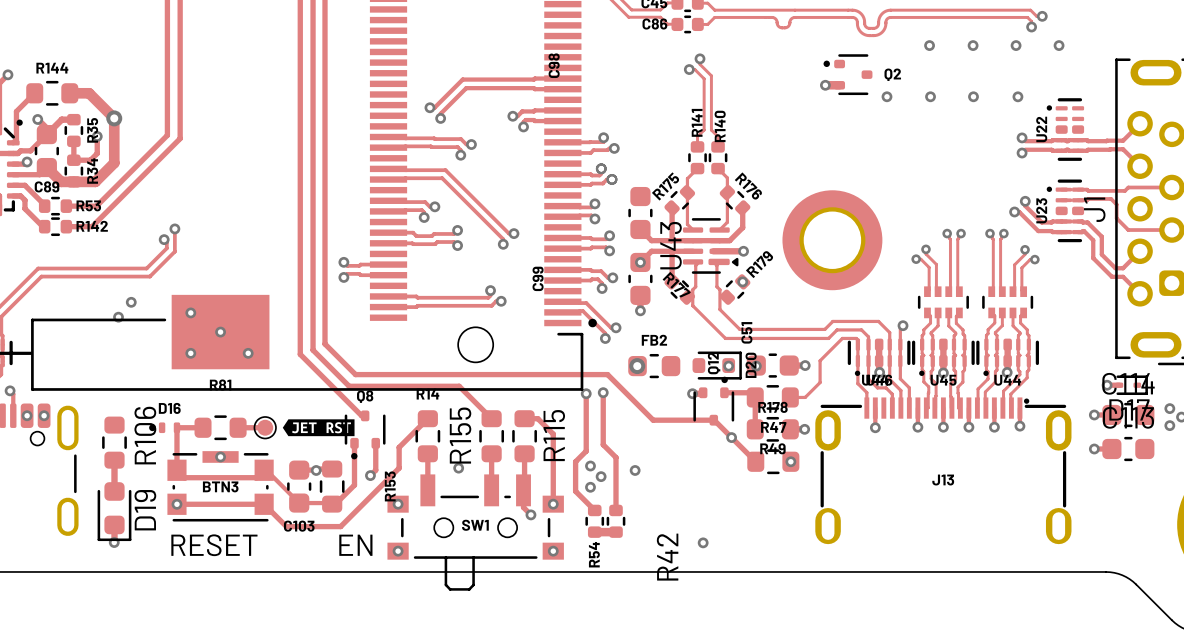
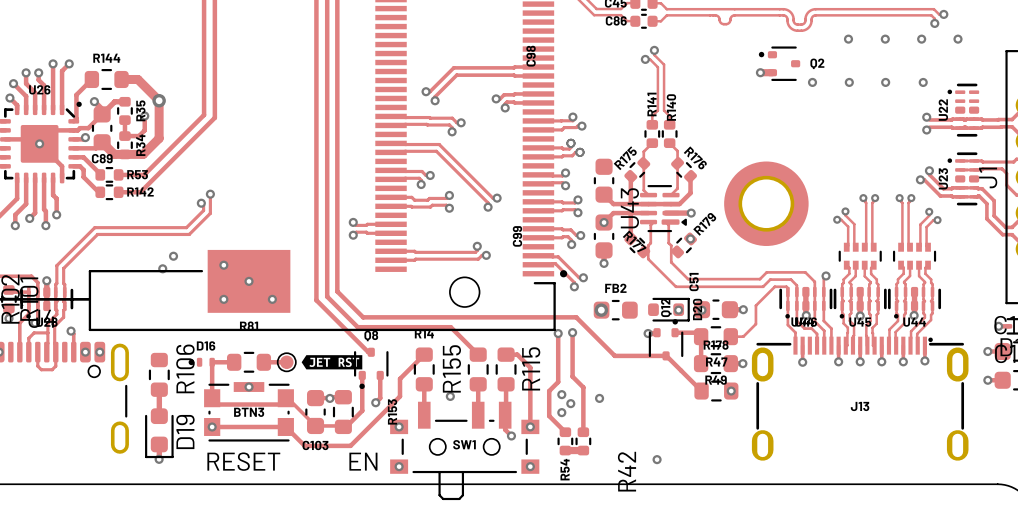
via: (731, 437) -> none

